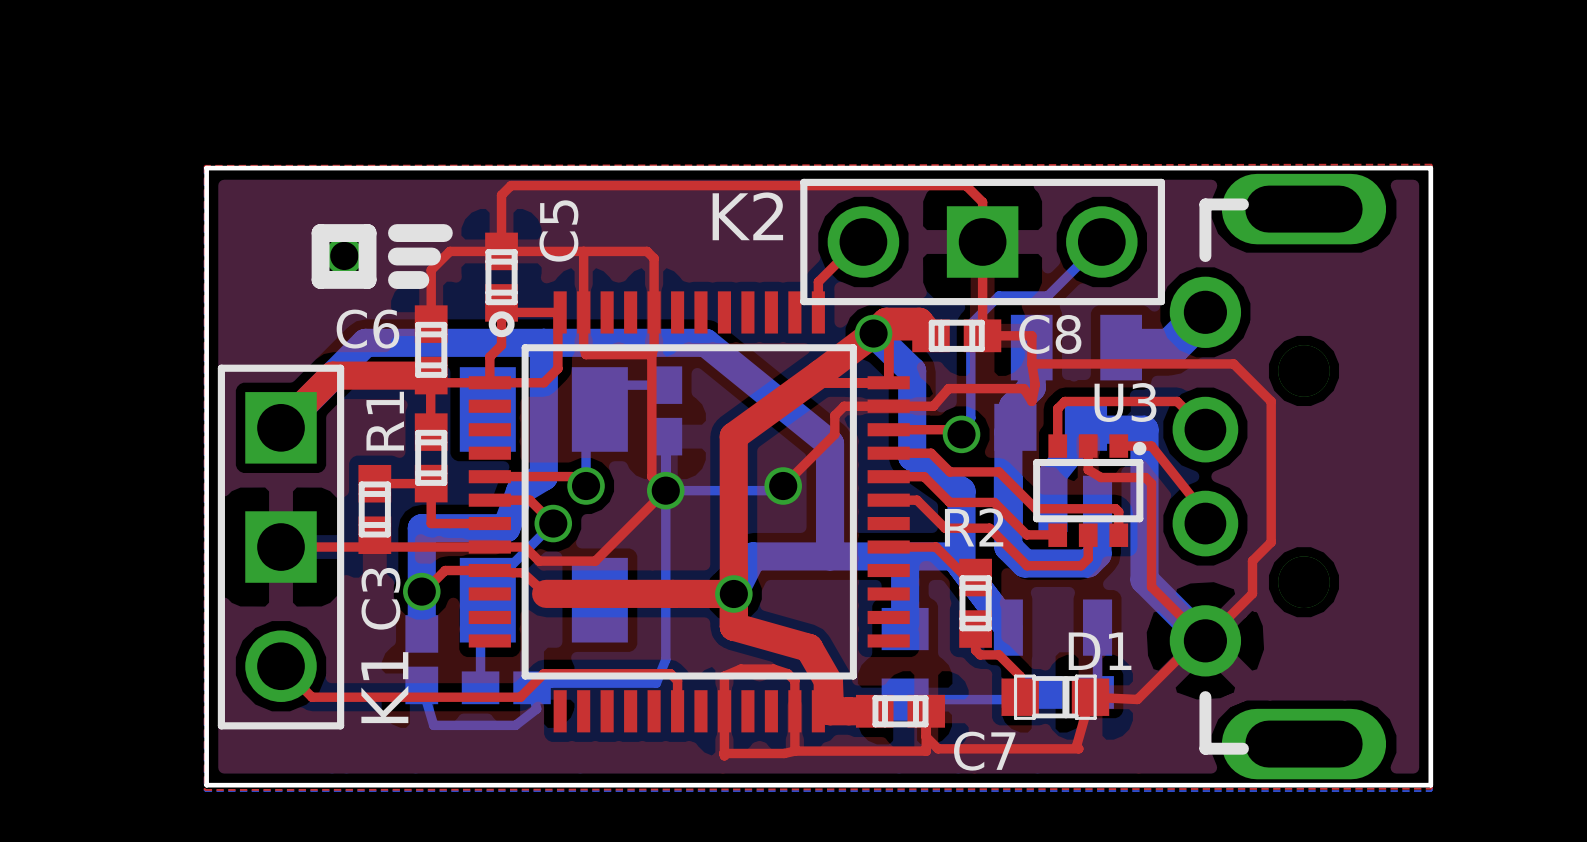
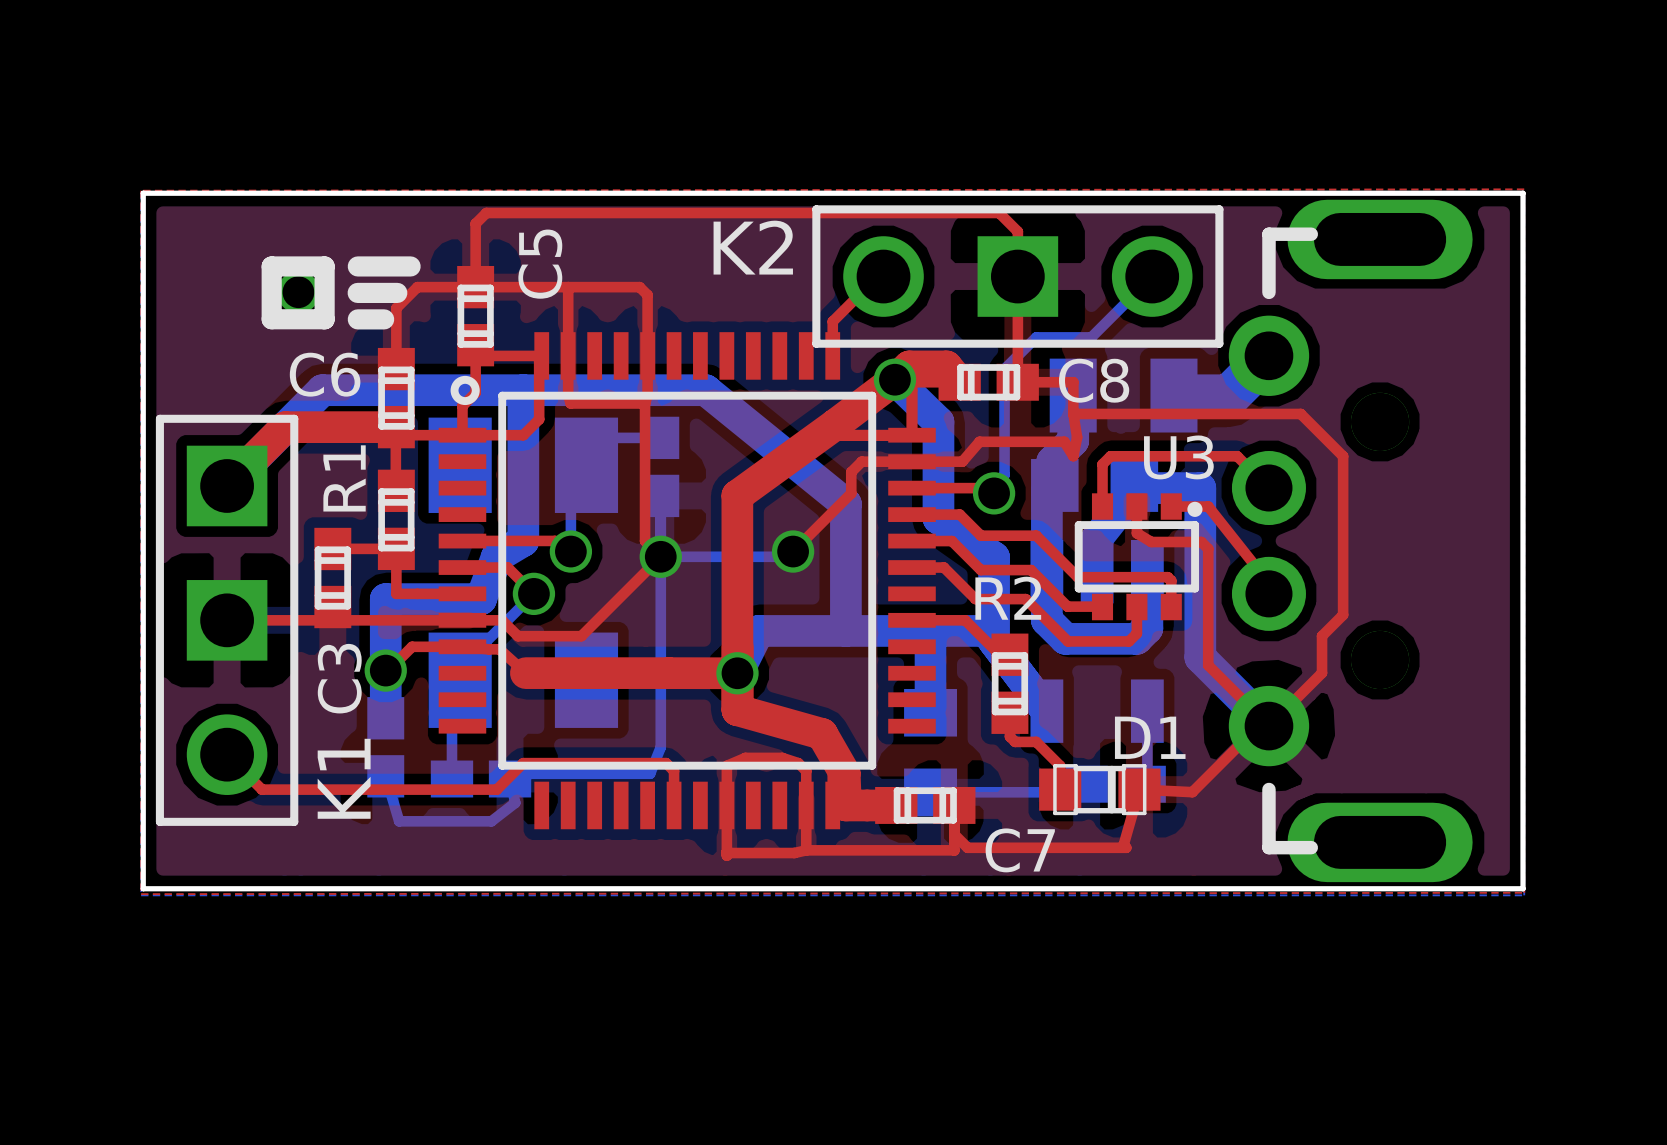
part footprint: [468, 291, 910, 733] -> [438, 332, 936, 830]

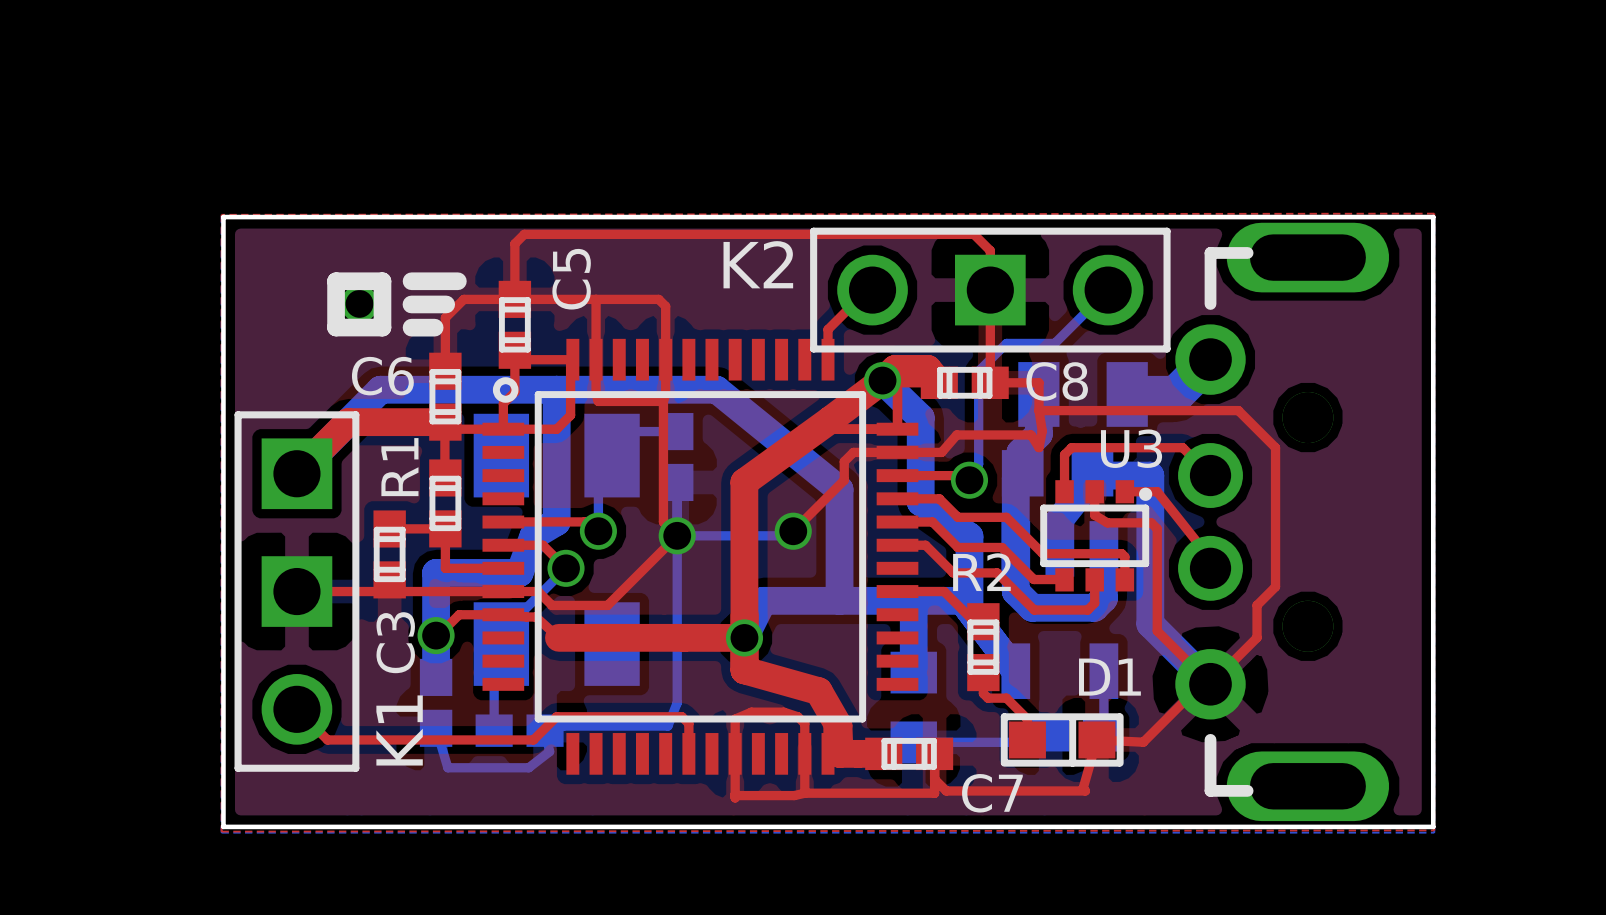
D1 name position: D1 (1150, 737) -> D1 (1109, 677)
D1 footprint: [1039, 764, 1161, 816] -> [1000, 713, 1124, 767]

